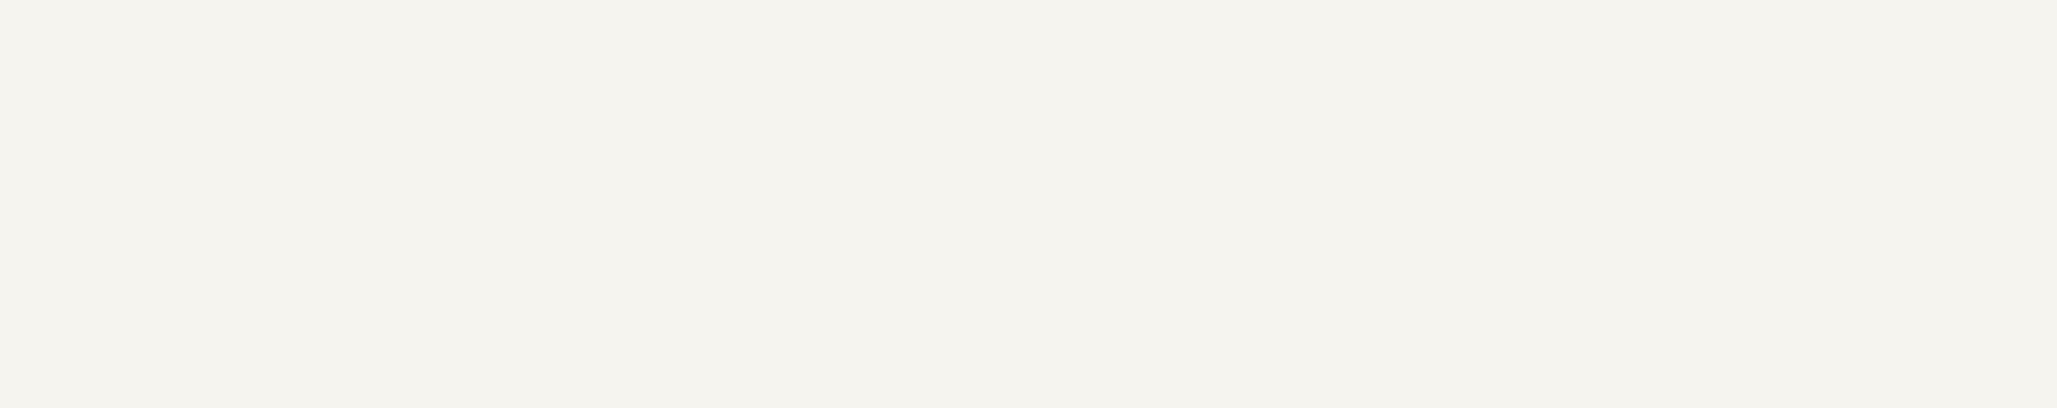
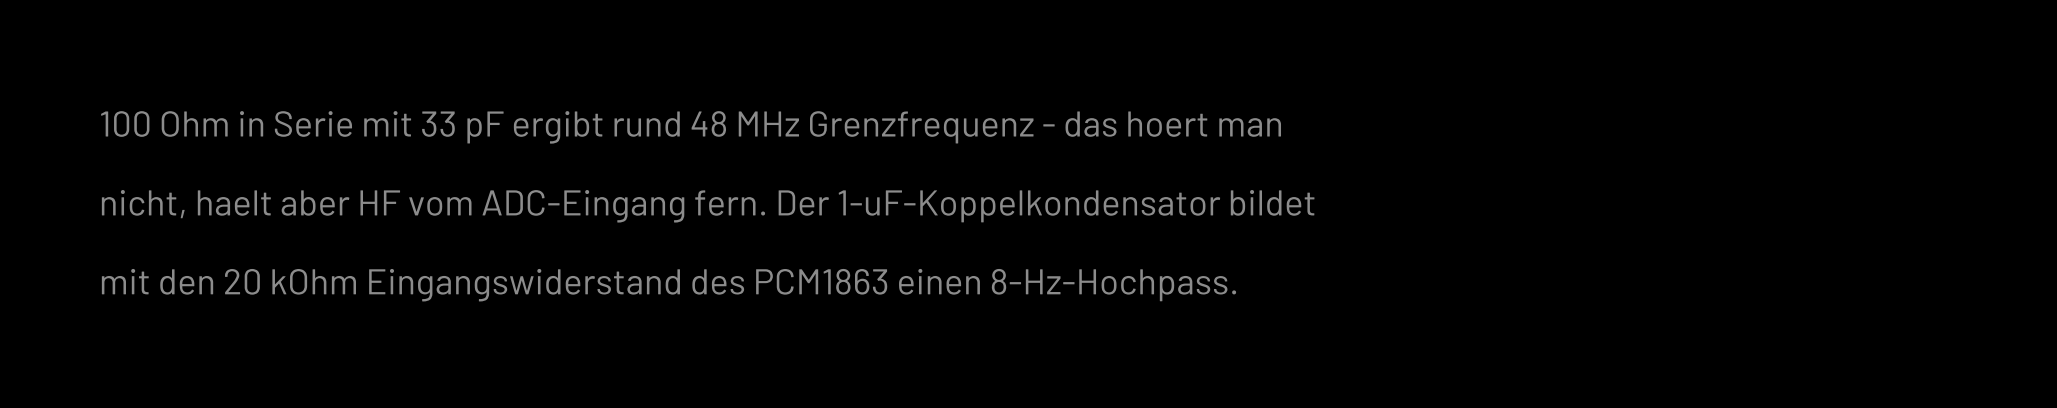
text: none -> 100 Ohm in Serie mit 33 pF ergibt rund 48 MHz Grenzfrequenz - das hoert man (691, 127)
text: none -> nicht, haelt aber HF vom ADC-Eingang fern. Der 1-uF-Koppelkondensator bildet (708, 206)
text: none -> mit den 20 kOhm Eingangswiderstand des PCM1863 einen 8-Hz-Hochpass. (668, 285)

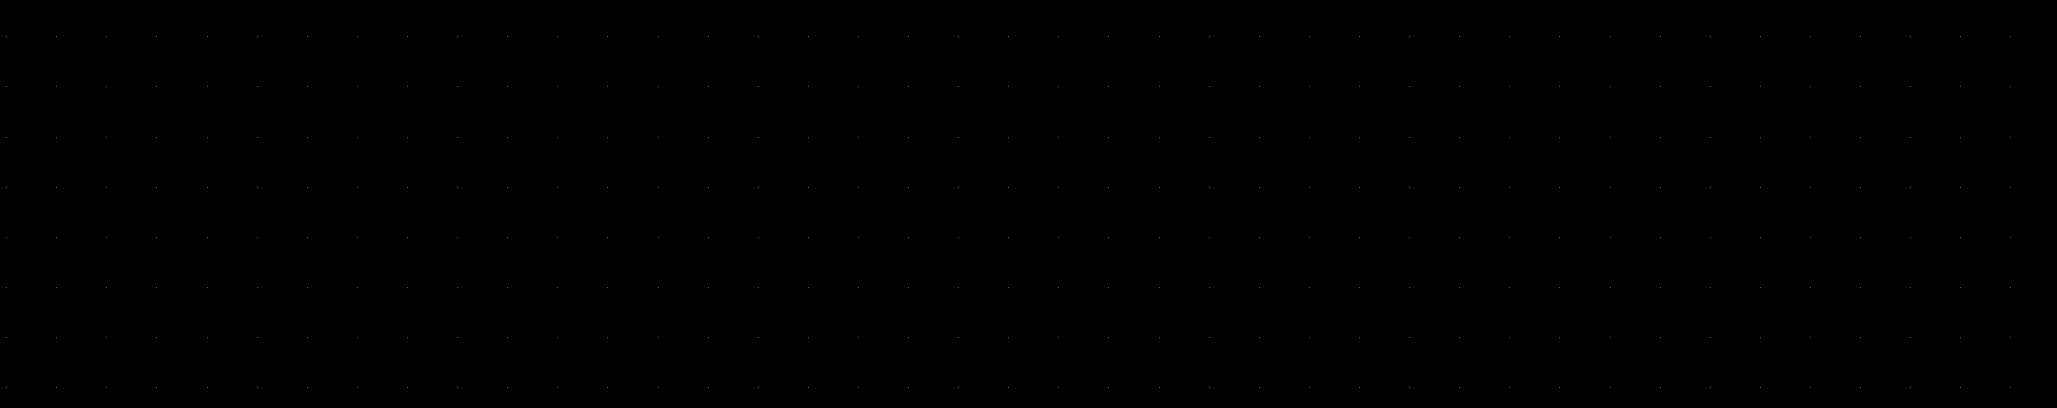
text: 100 Ohm in Serie mit 33 pF ergibt rund 48 MHz Grenzfrequenz - das hoert man (691, 127) -> none
text: nicht, haelt aber HF vom ADC-Eingang fern. Der 1-uF-Koppelkondensator bildet (708, 206) -> none
text: mit den 20 kOhm Eingangswiderstand des PCM1863 einen 8-Hz-Hochpass. (668, 285) -> none

